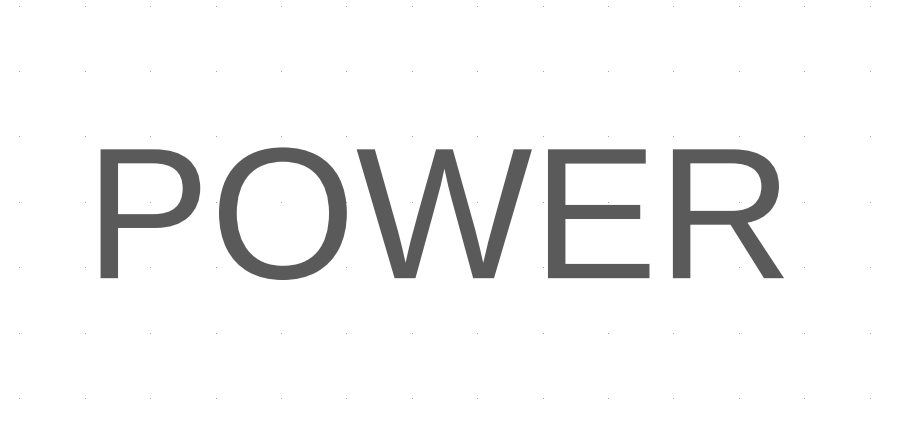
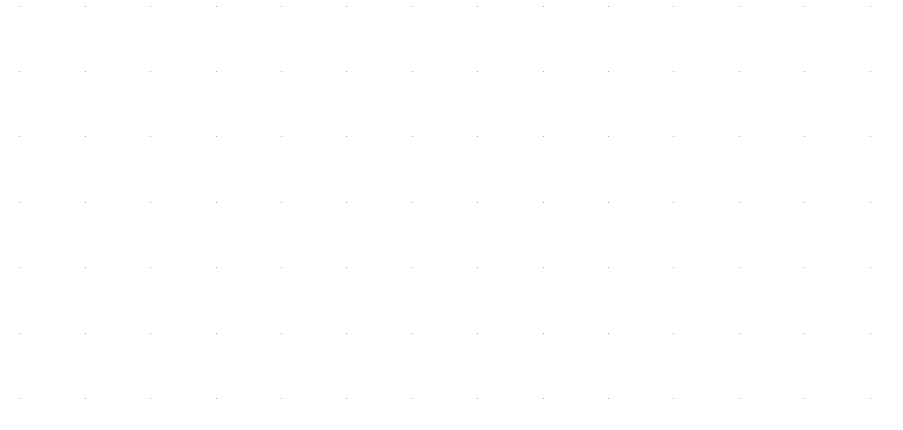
text: POWER (442, 213) -> none

